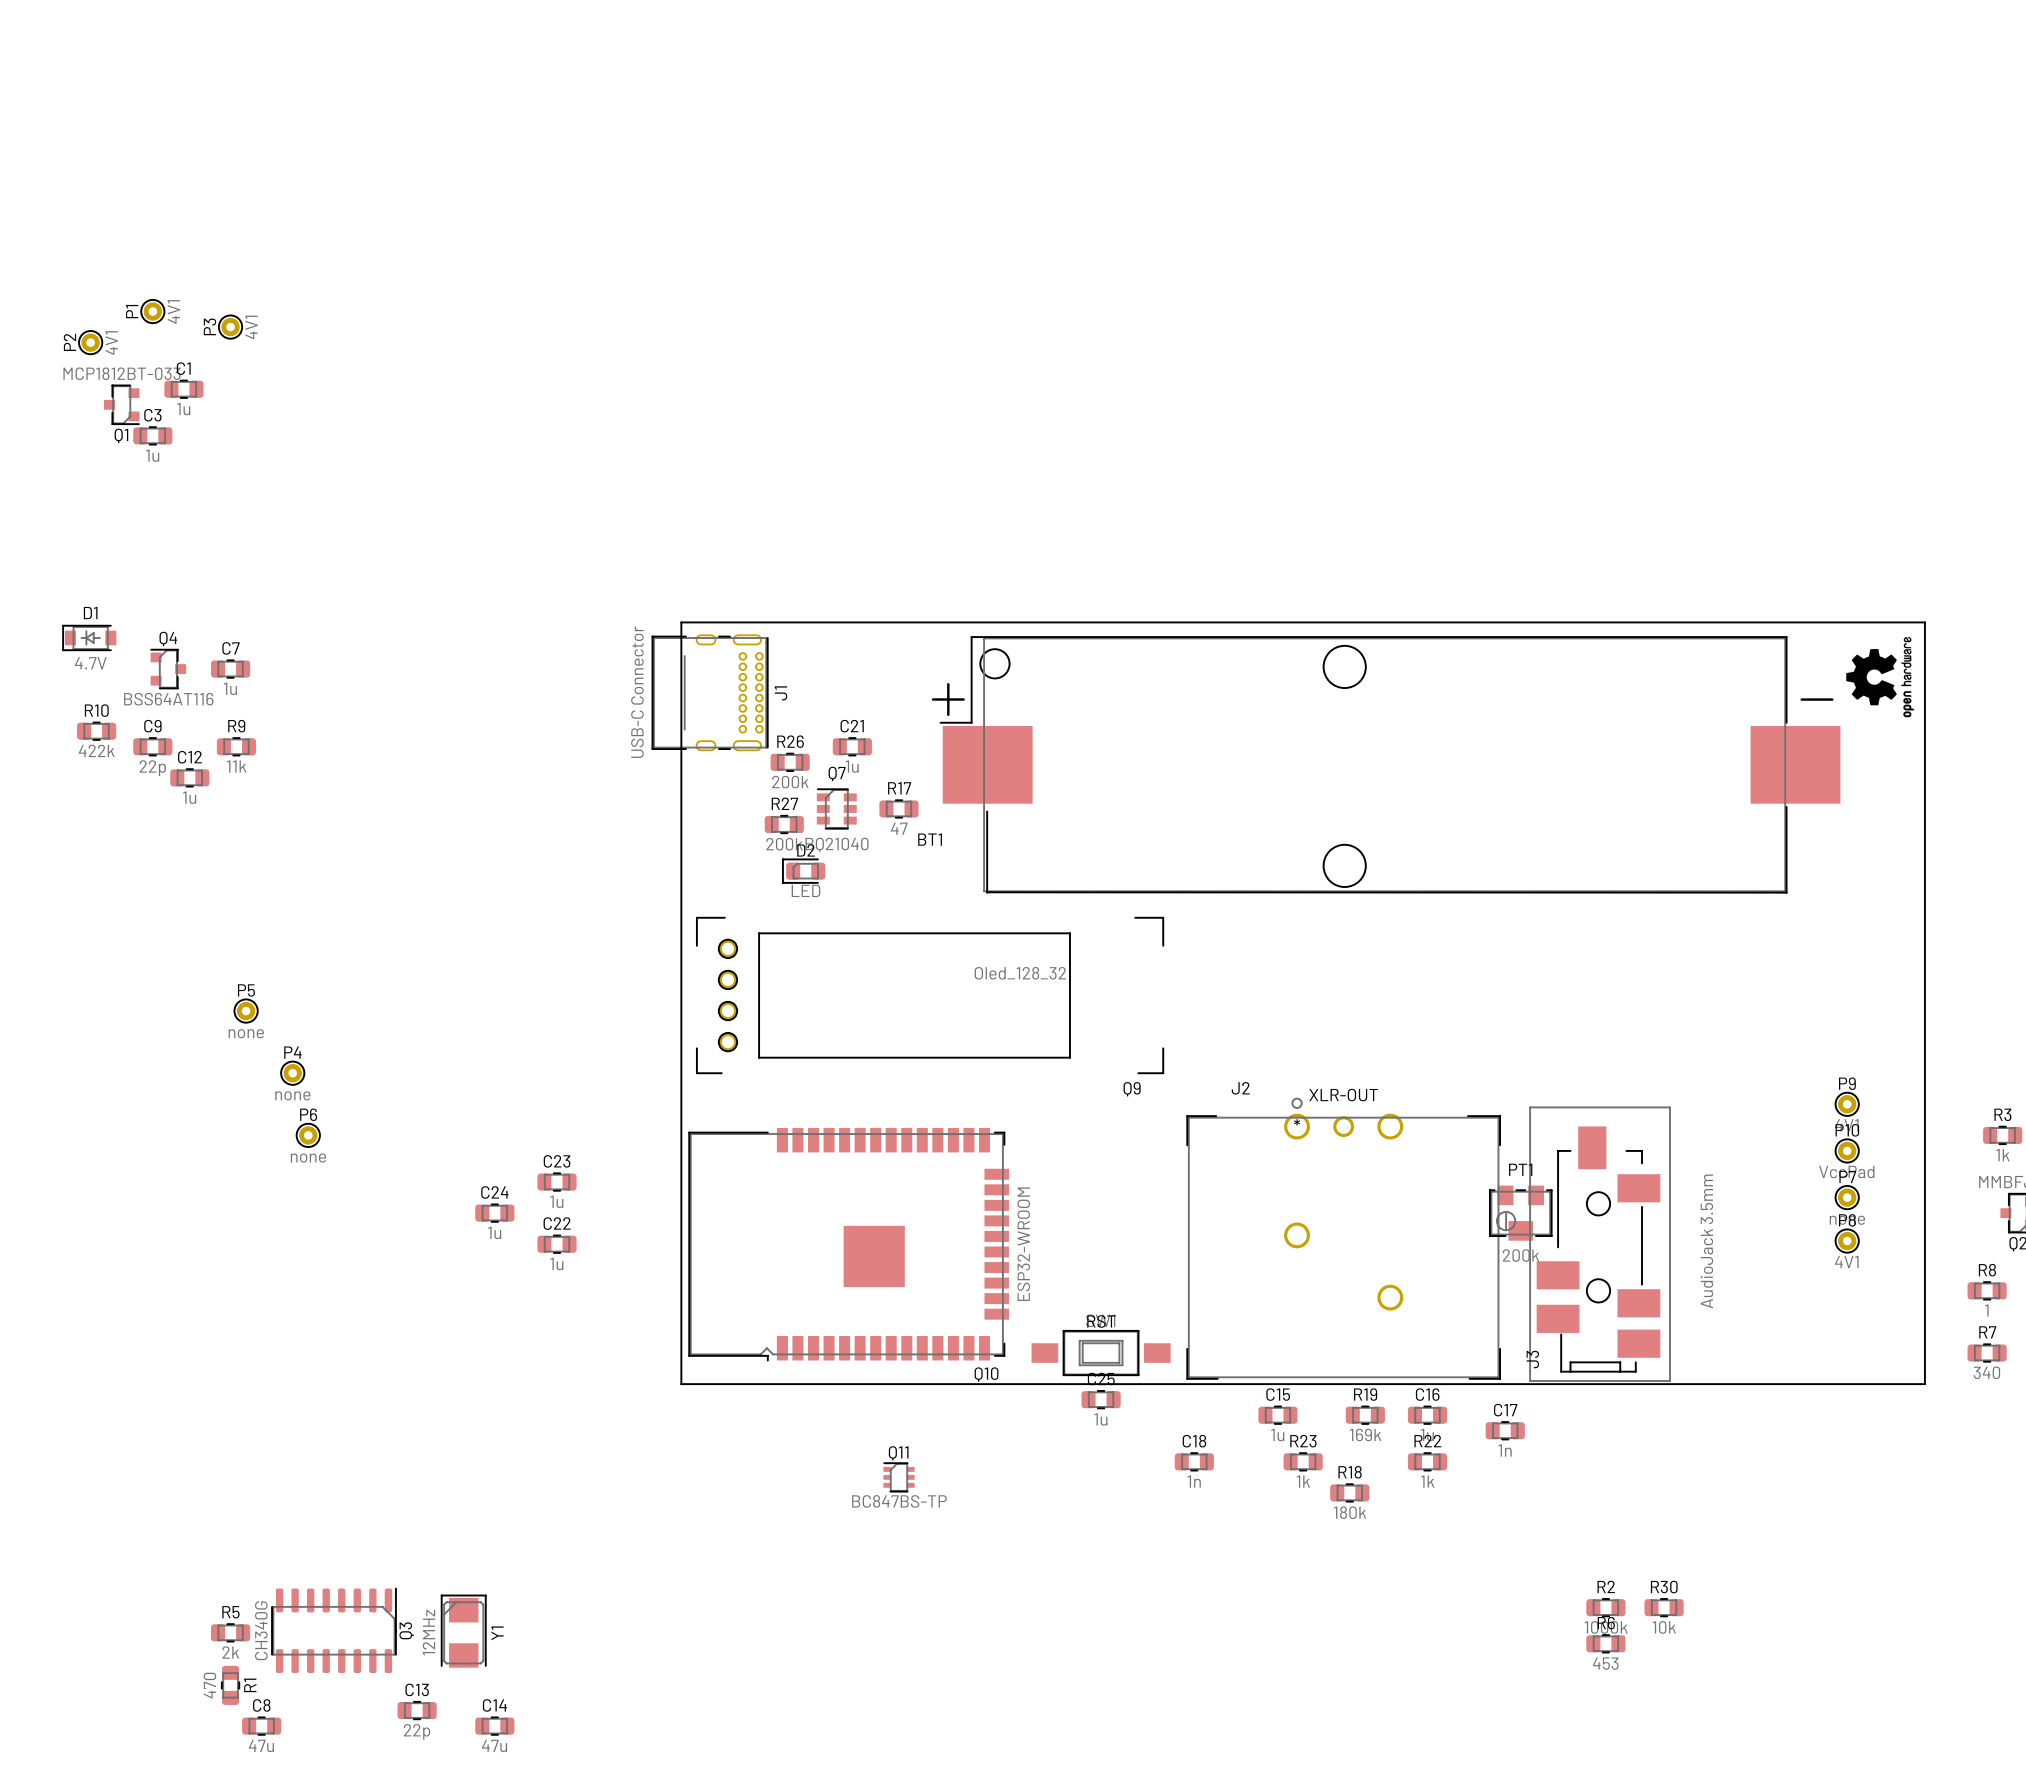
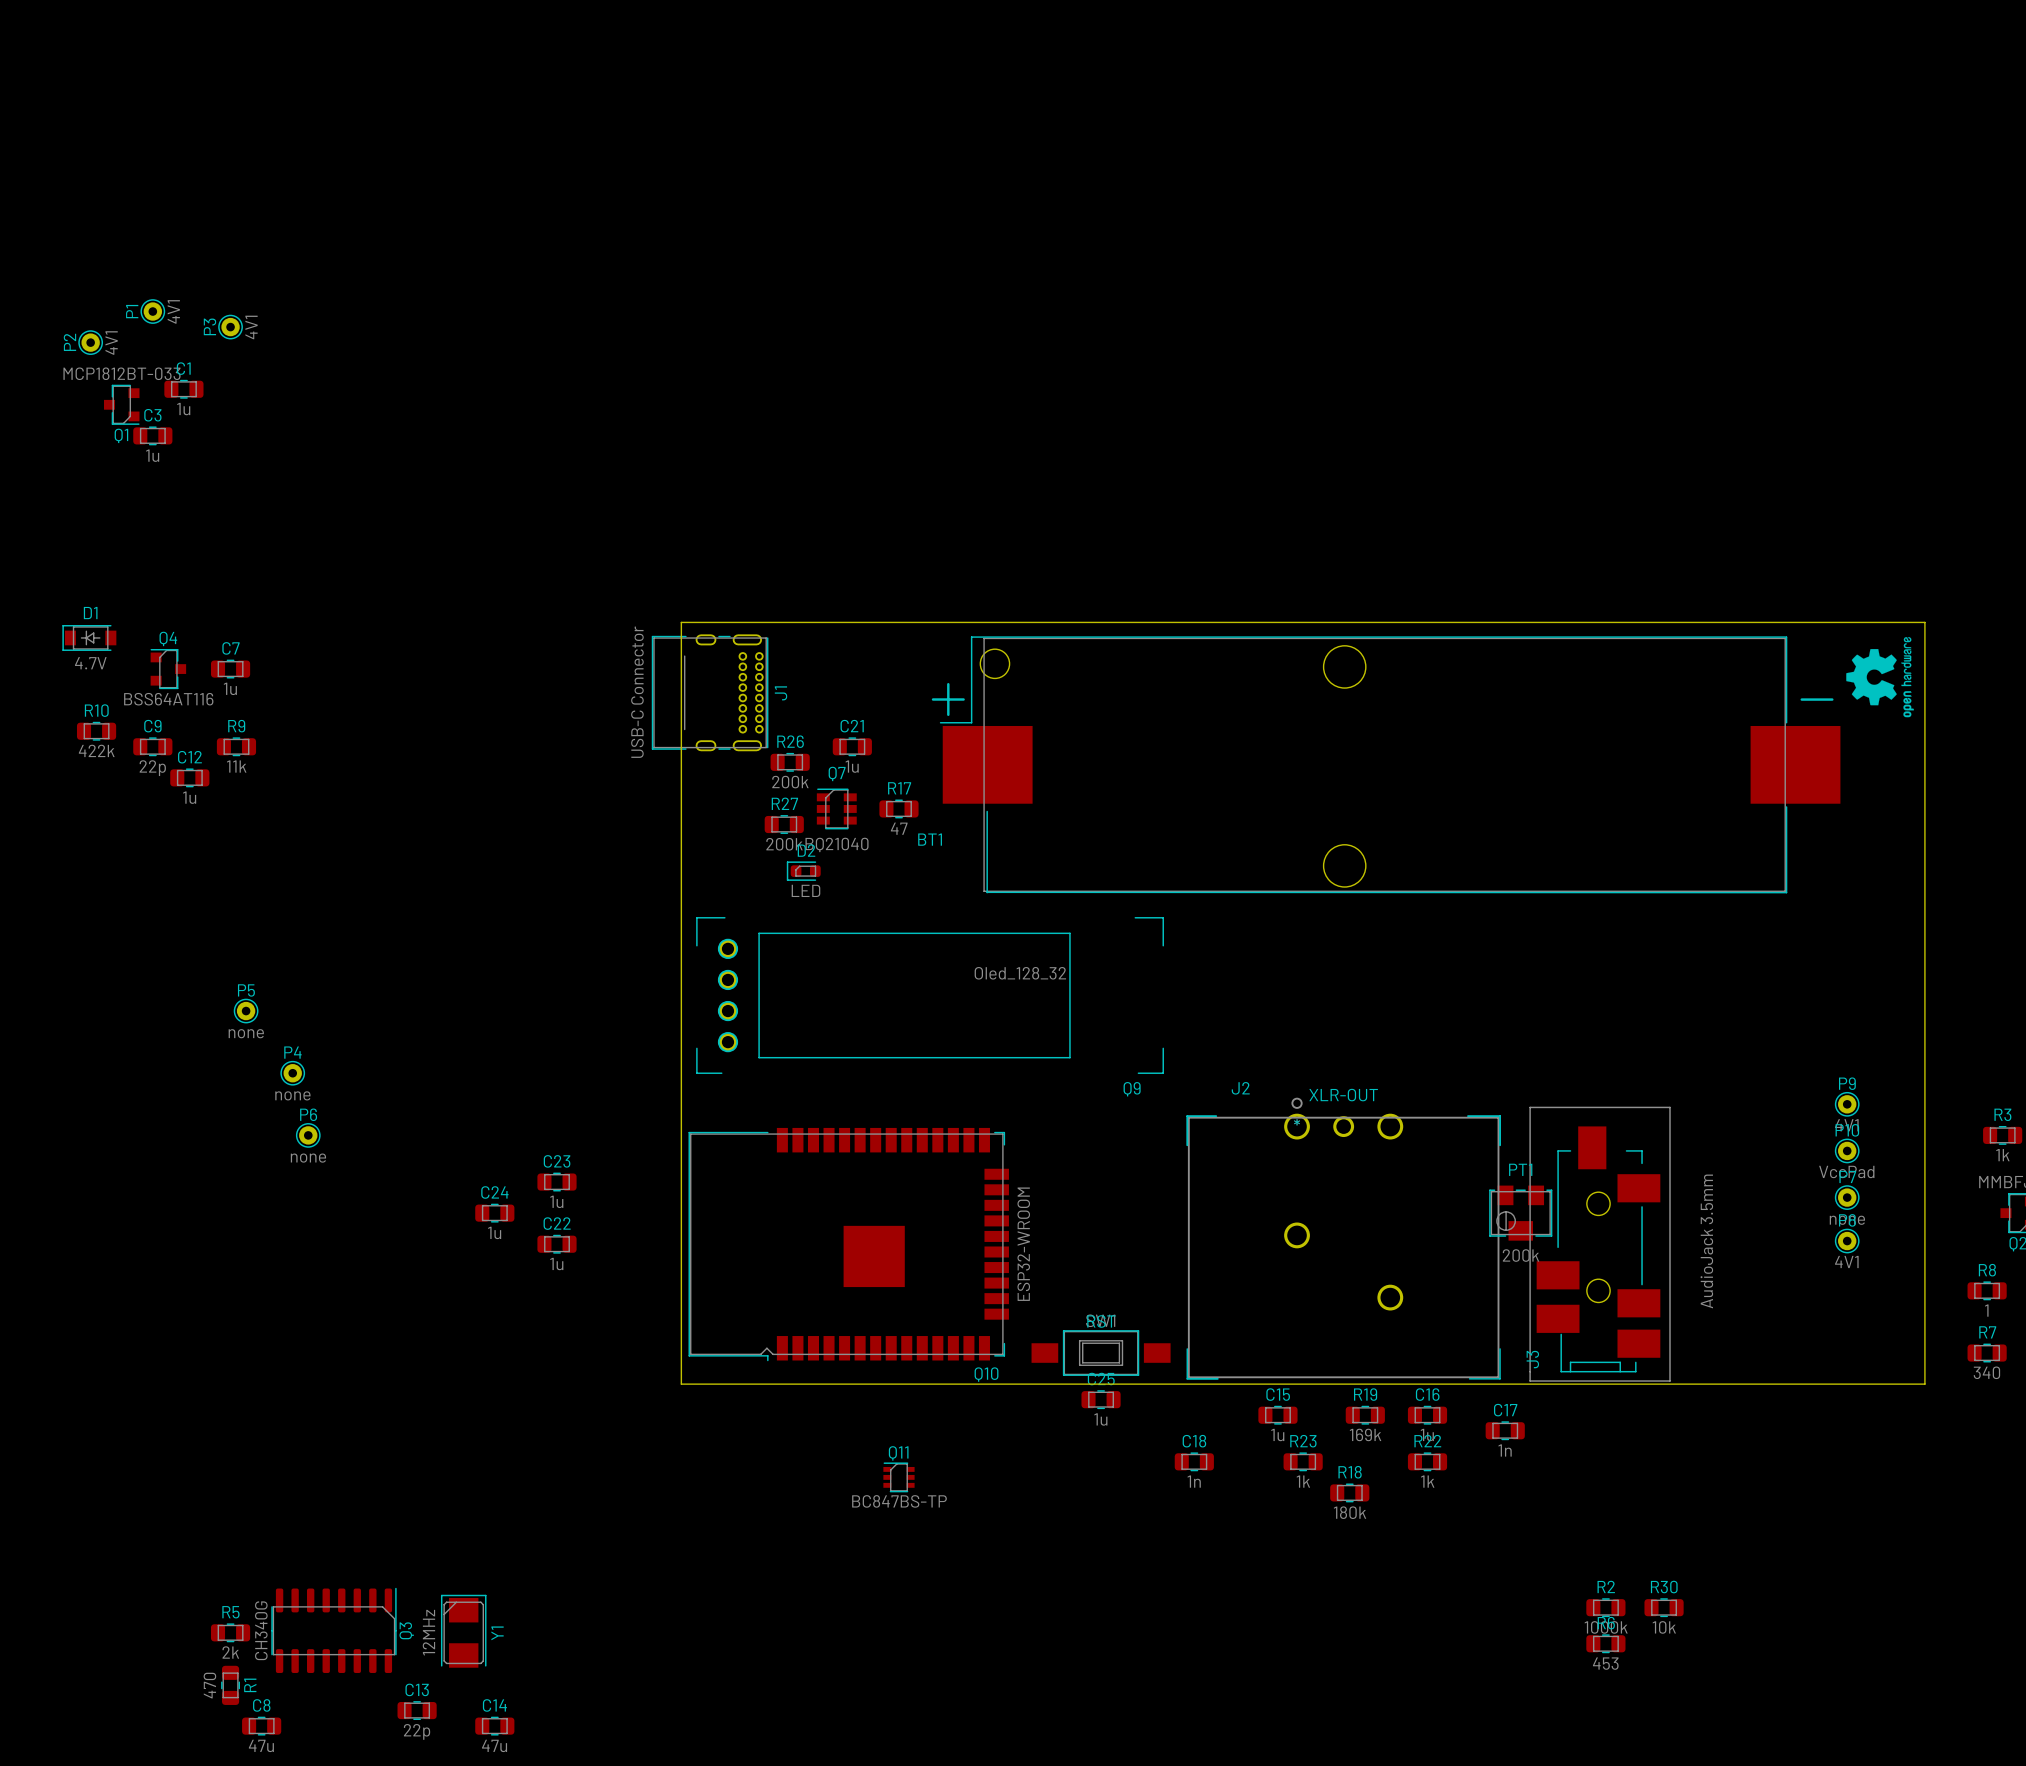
D2 footprint: [782, 858, 826, 884] -> [786, 861, 821, 881]

